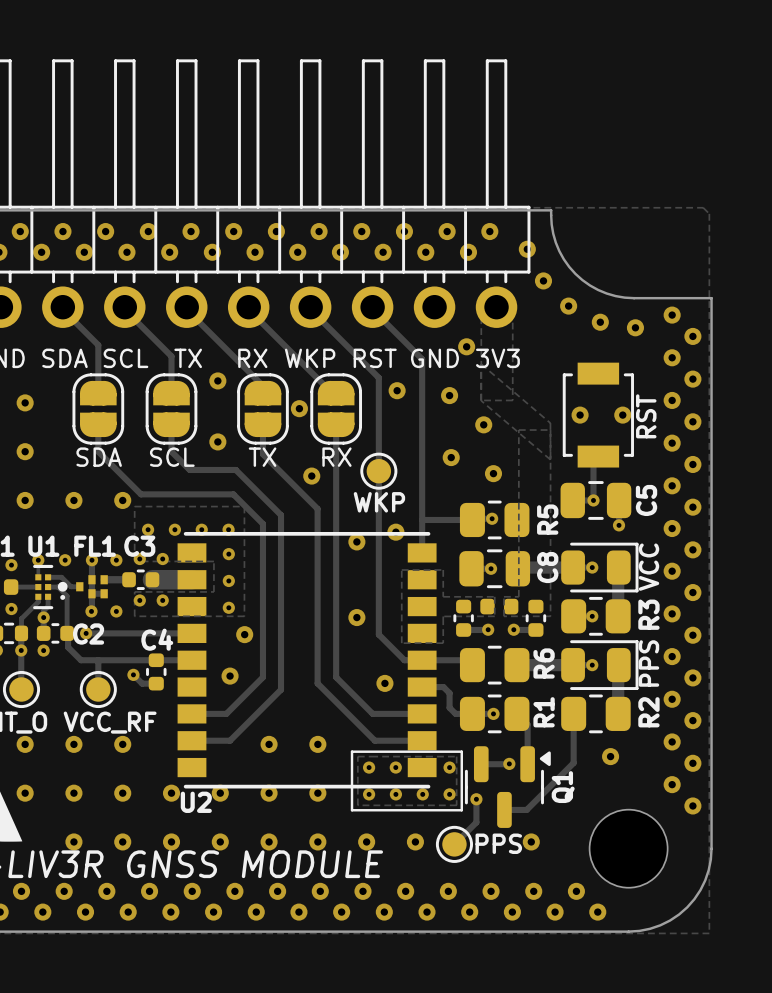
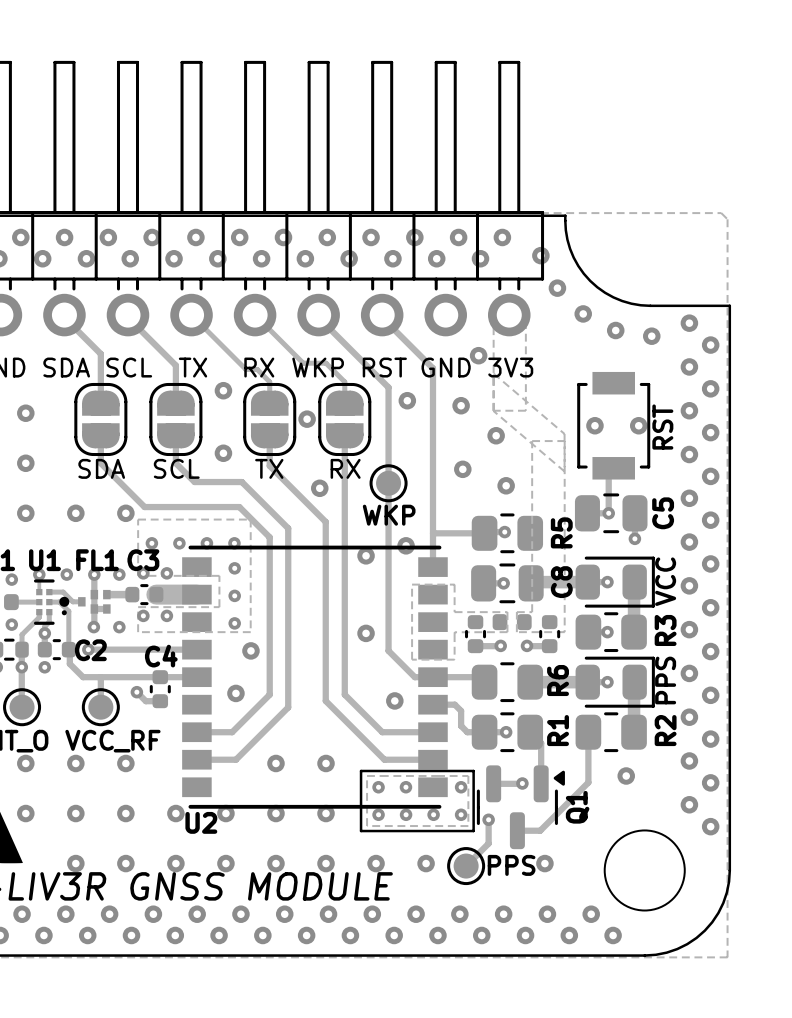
track: none -> (191, 315) (245, 369) (257, 369) (269, 381) (269, 403)
track: none -> (255, 315) (303, 363) (326, 363) (344, 381) (344, 403)
track: (188, 311) (262, 385) -> none
track: (250, 311) (332, 393) -> none

